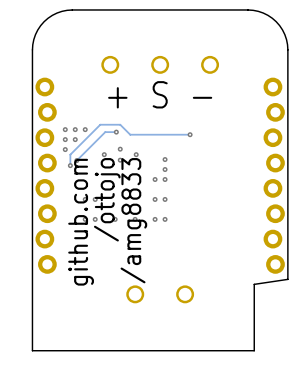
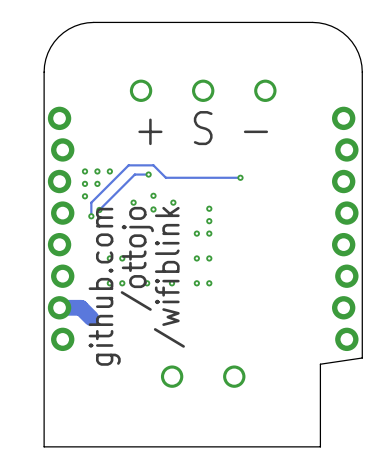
text: /amg8833 (133, 220) -> /wifiblink (169, 277)
track: none -> (59, 307) (80, 307) (91, 318)

